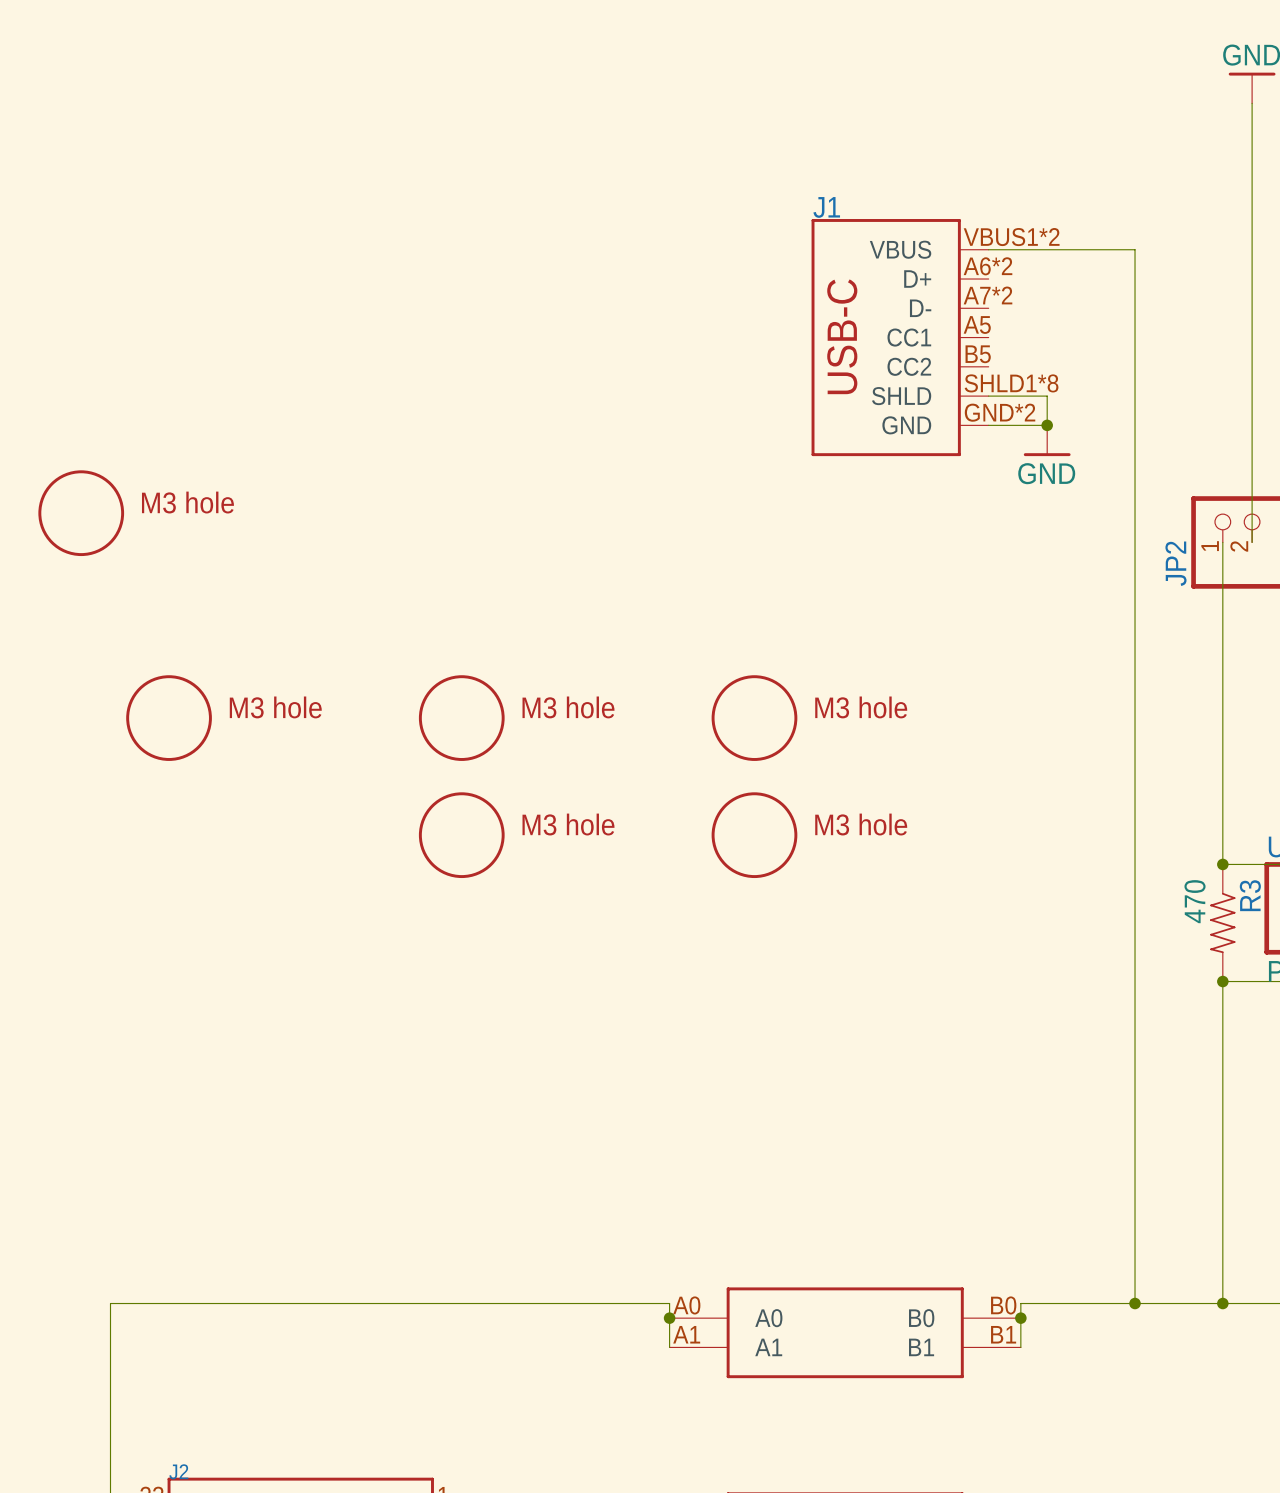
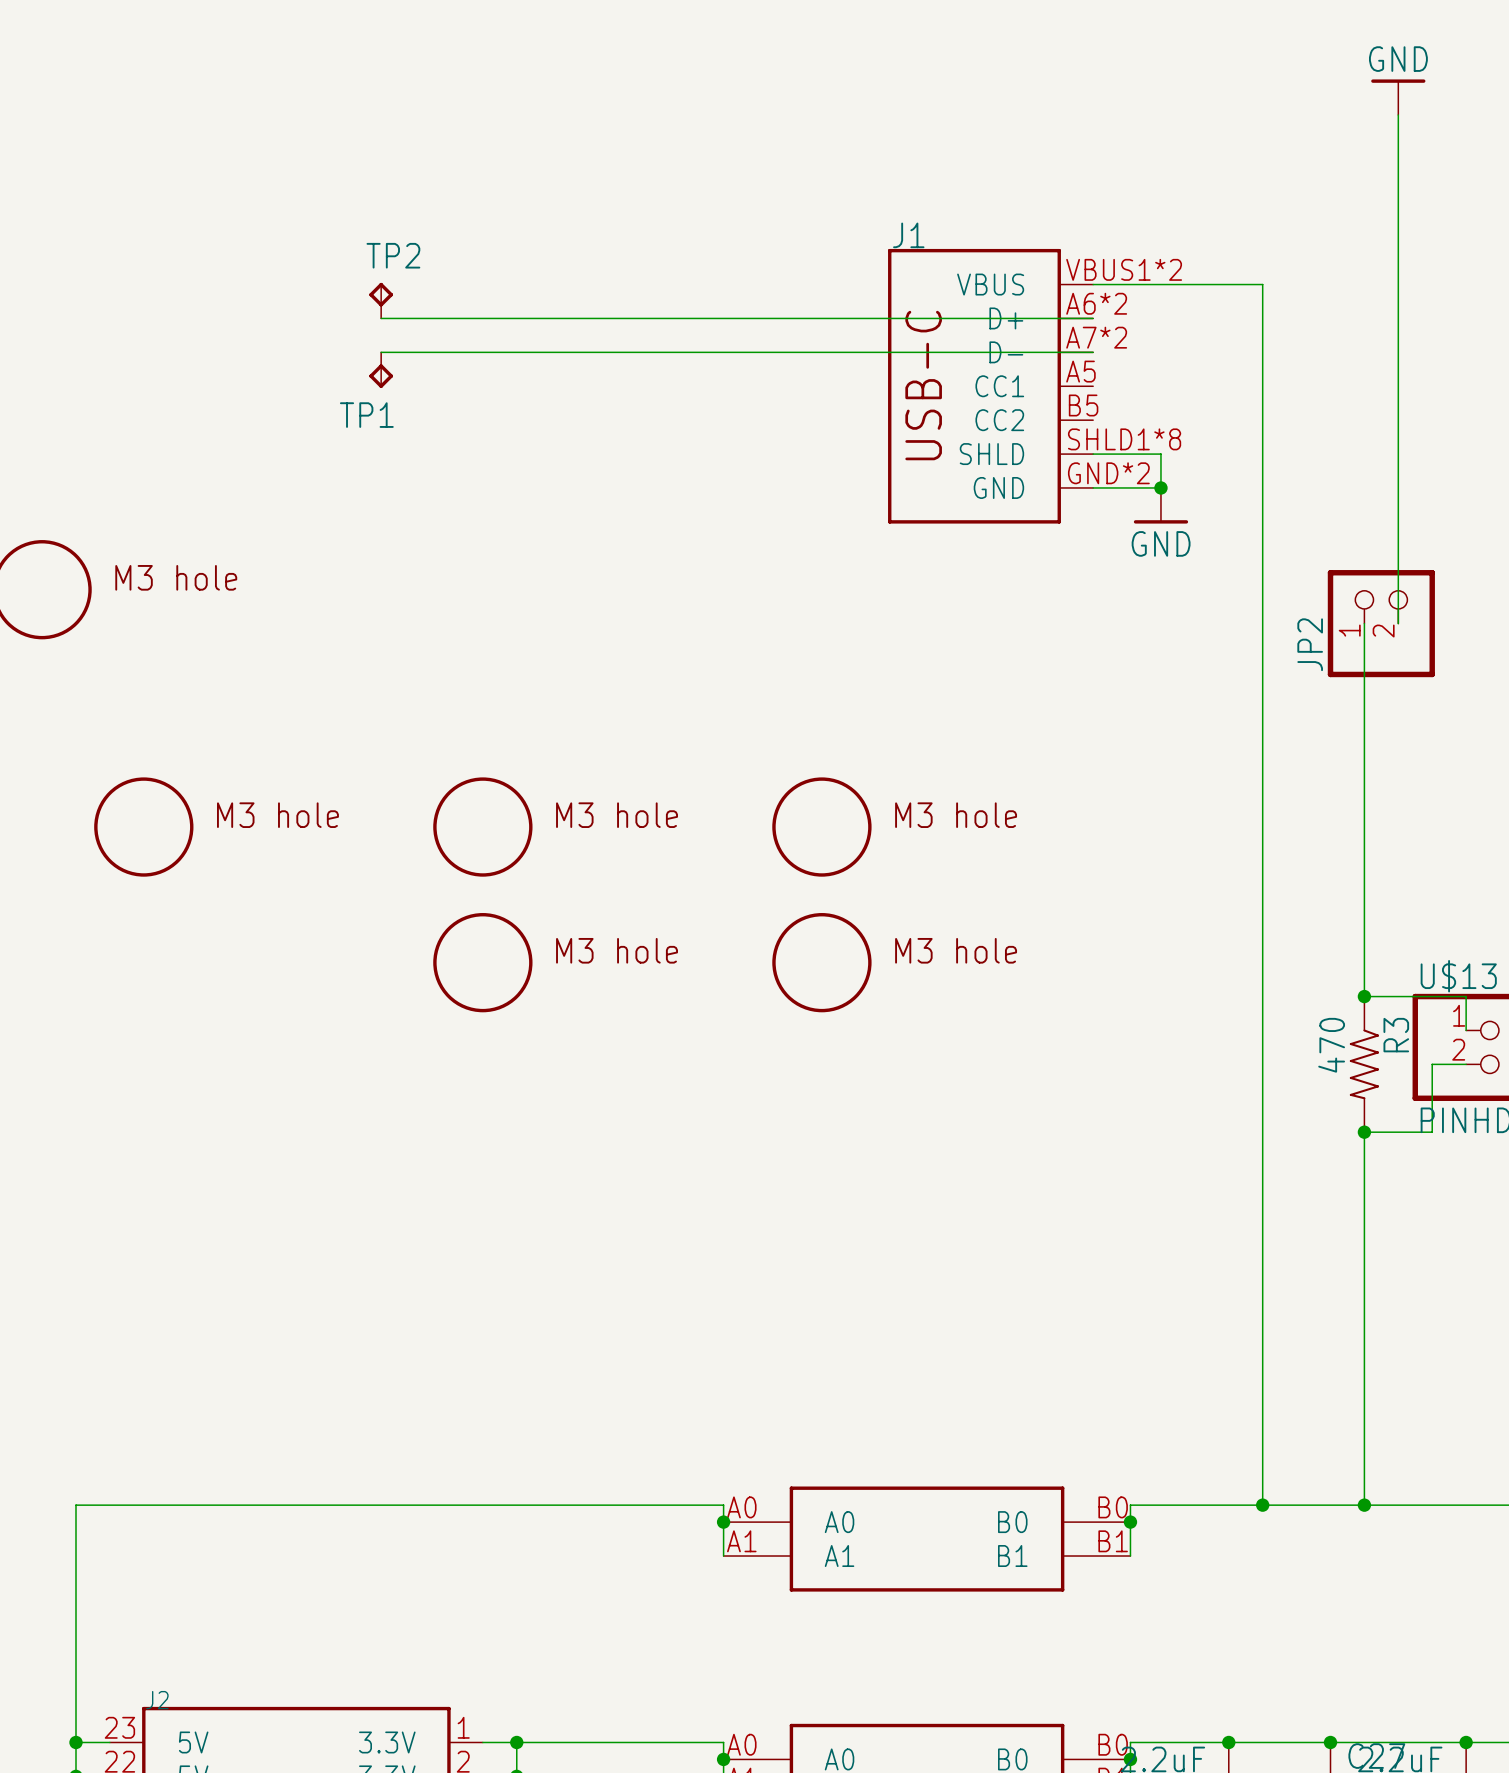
TP2: none -> (381, 300)
wire: none -> (381, 318) (1093, 318)
wire: none -> (381, 352) (1093, 352)
TP1: none -> (381, 370)

